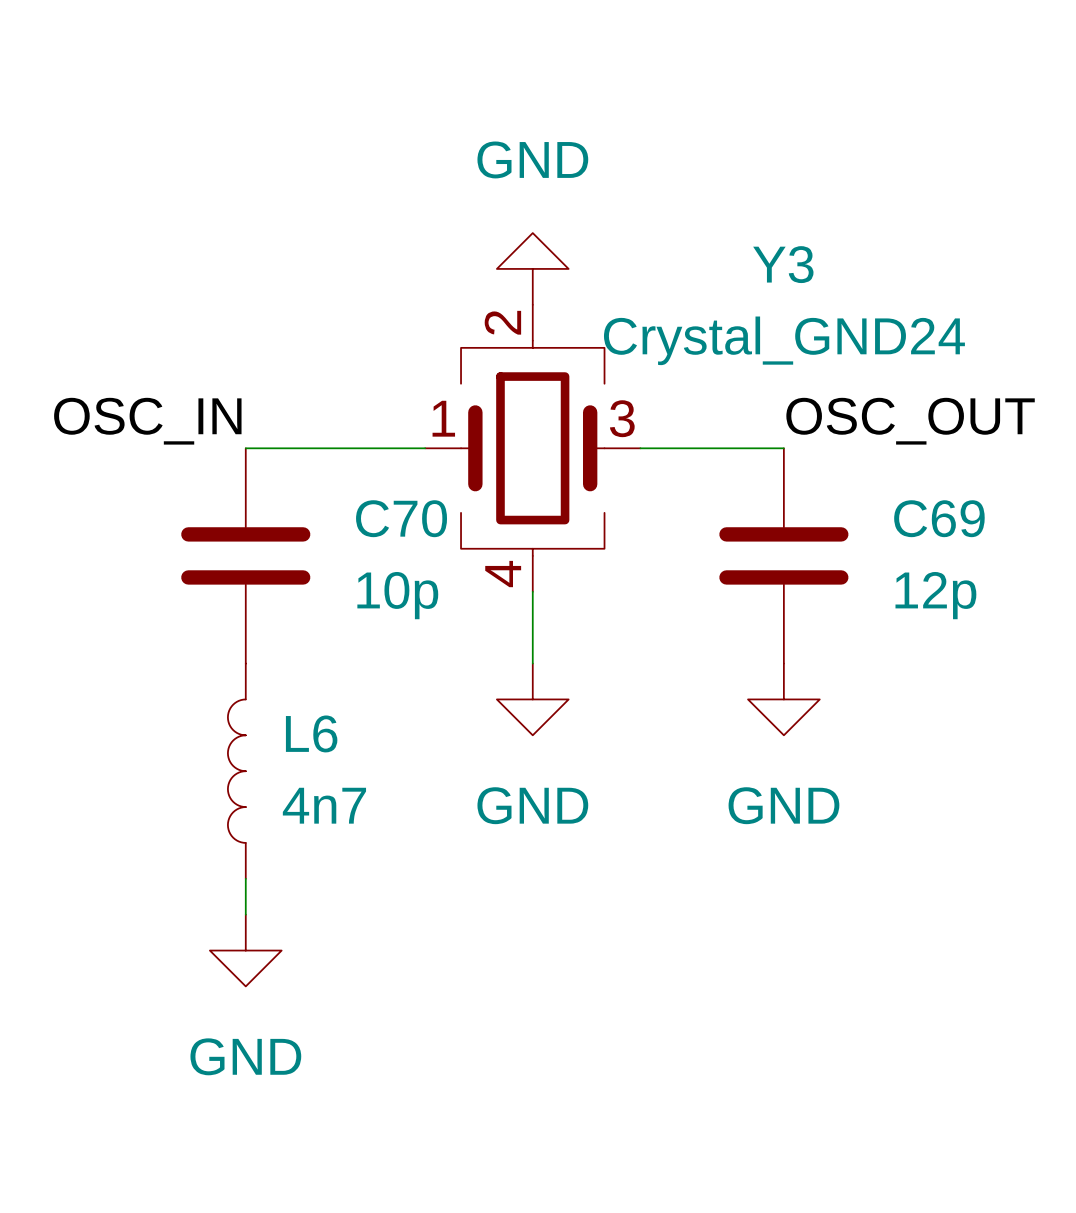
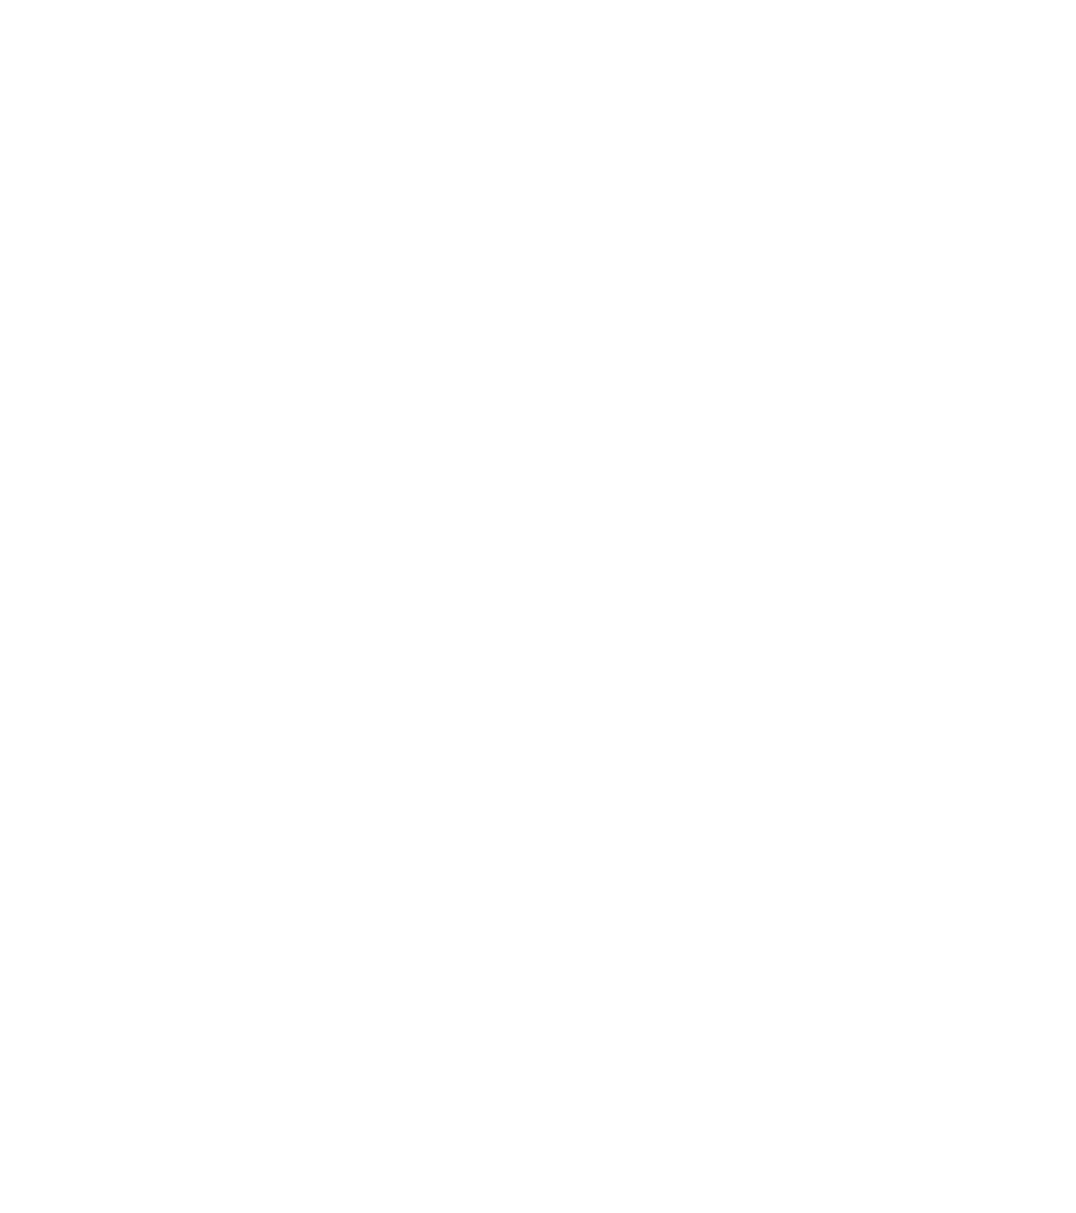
power symbol: GND (532, 268) -> none
label: OSC_IN (147, 421) -> none
label: OSC_OUT (910, 421) -> none
wire: (245, 448) (425, 448) -> none
Y3: Crystal_GND24 (532, 448) -> none
wire: (640, 448) (783, 448) -> none
C70: 10p (245, 555) -> none
C69: 12p (783, 555) -> none
wire: (532, 591) (532, 663) -> none
power symbol: GND (532, 699) -> none
power symbol: GND (783, 699) -> none
L6: 4n7 (236, 771) -> none
wire: (245, 878) (245, 914) -> none
power symbol: GND (245, 950) -> none

